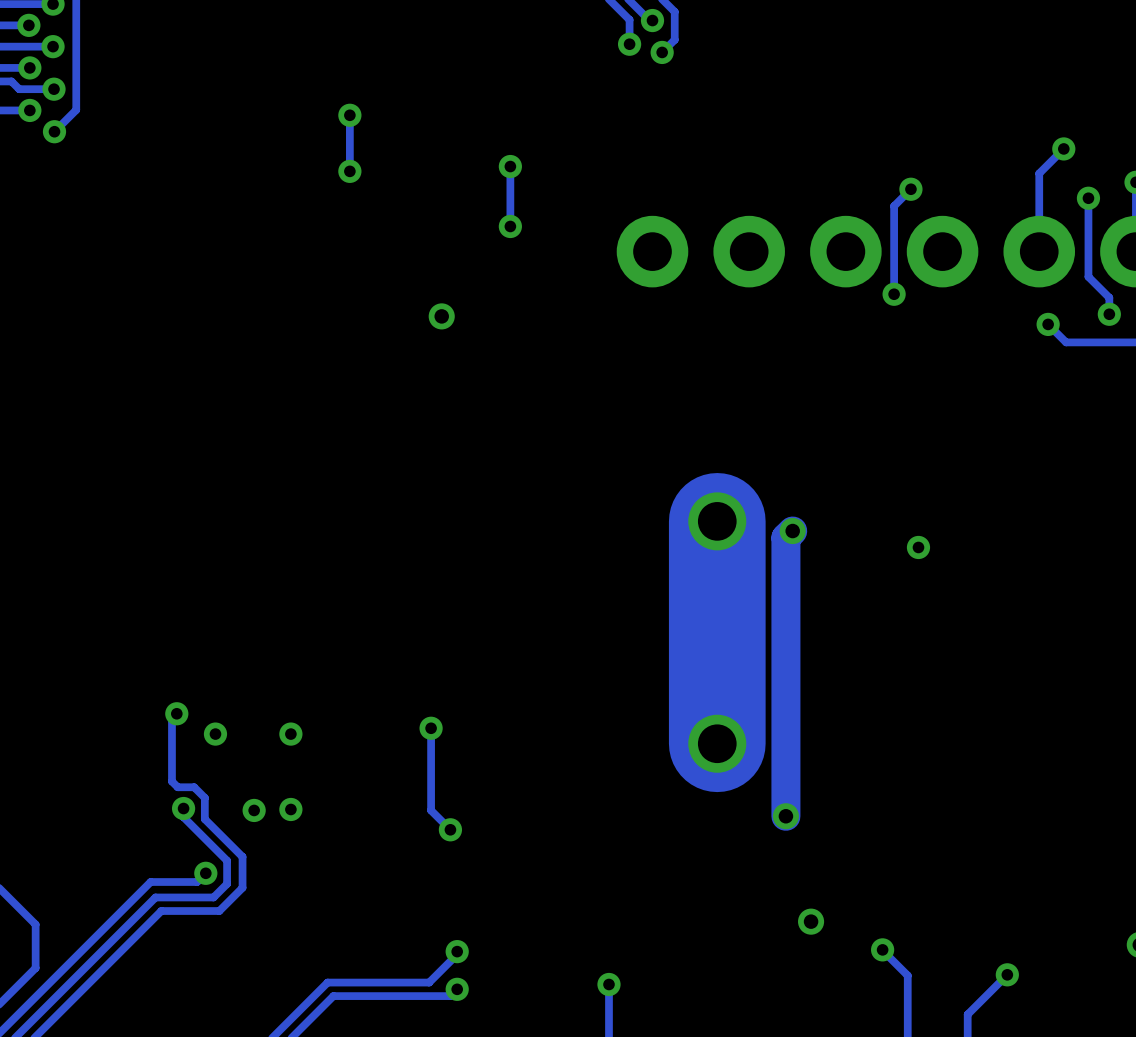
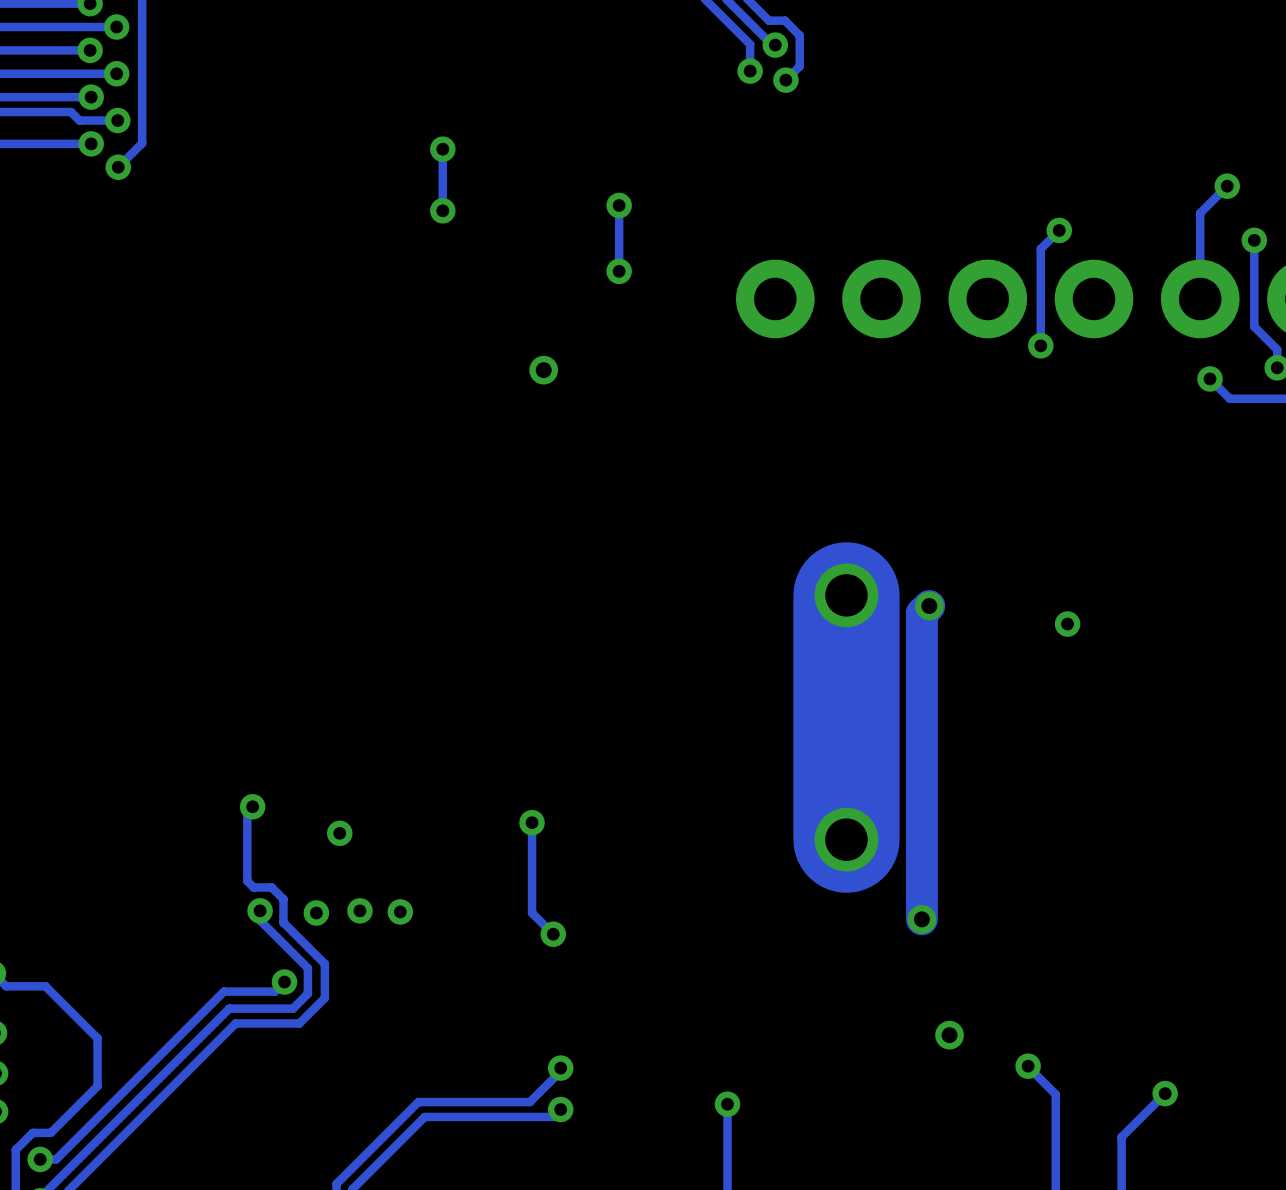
via: (215, 734) -> none
via: (290, 734) -> none
via: none -> (339, 833)
via: none -> (359, 910)
via: (290, 809) -> none
via: none -> (400, 911)
via: none -> (316, 912)
via: (254, 810) -> none

